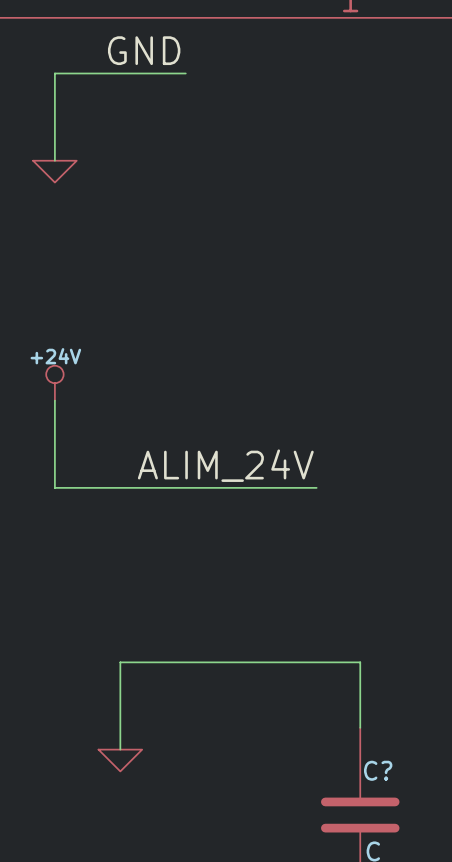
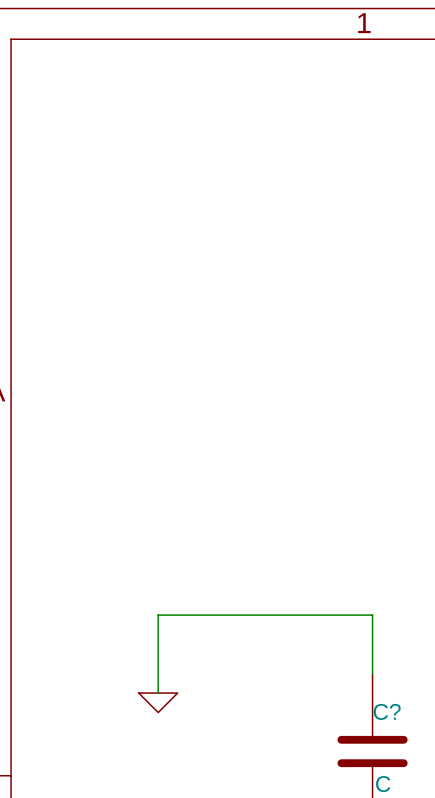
label: GND (144, 50) -> none
wire: (185, 73) (54, 73) (54, 160) -> none
power symbol: (54, 171) -> none
power symbol: +24V (54, 383) -> none
wire: (54, 400) (54, 487) (316, 487) -> none
label: ALIM_24V (225, 465) -> none

